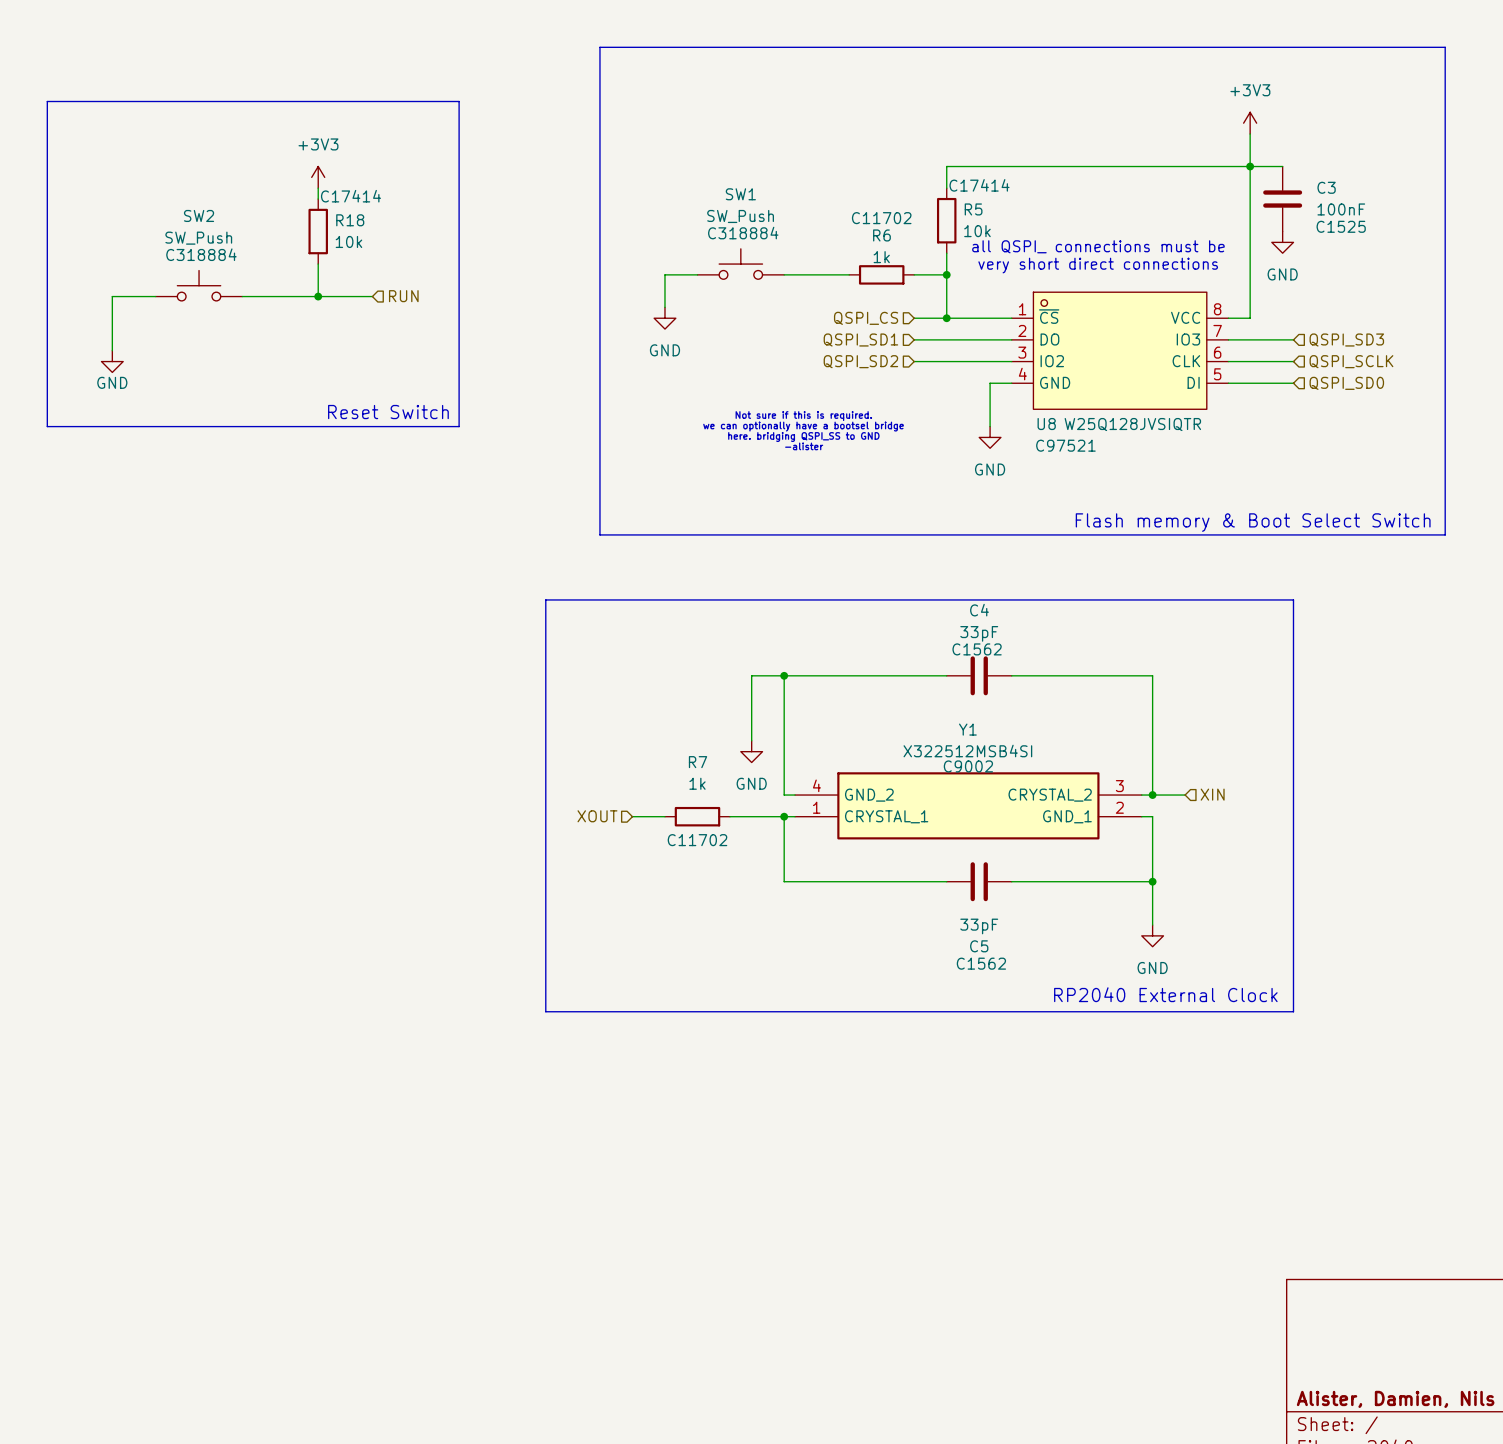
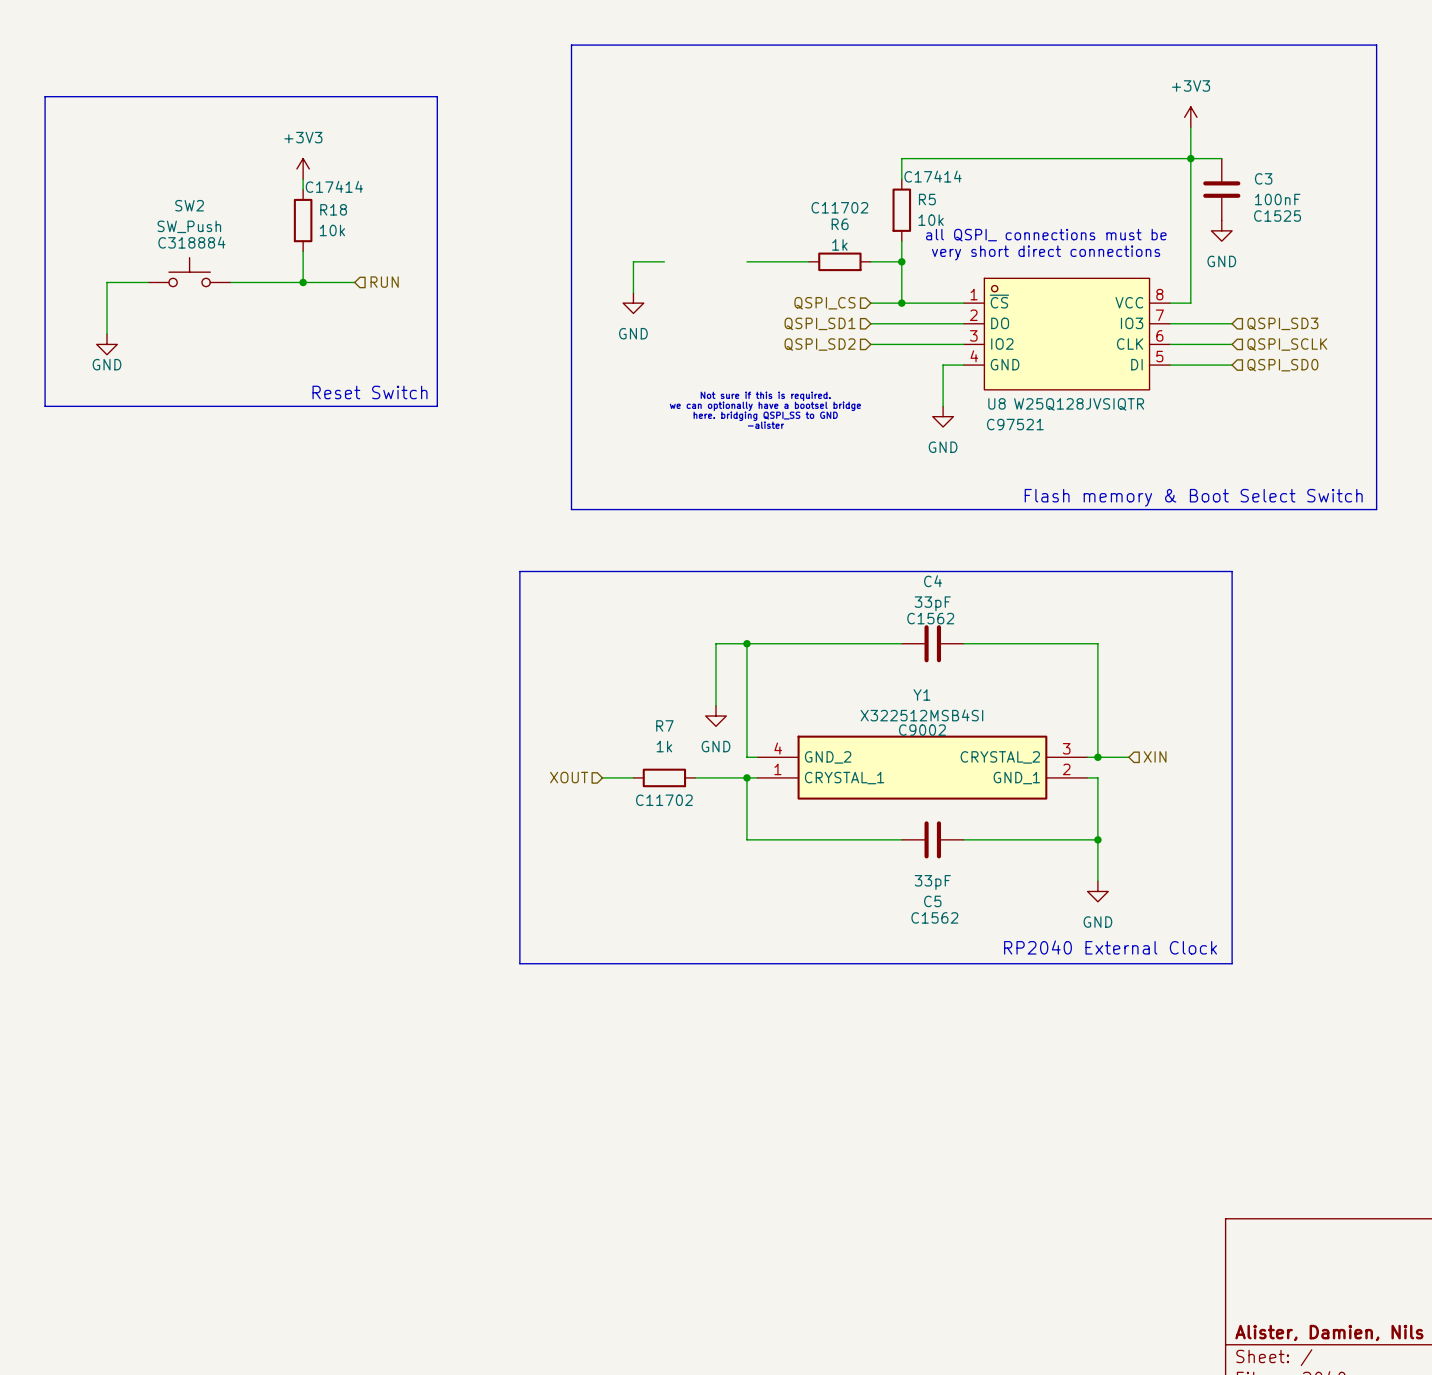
SW1: SW_Push (740, 264) -> none

